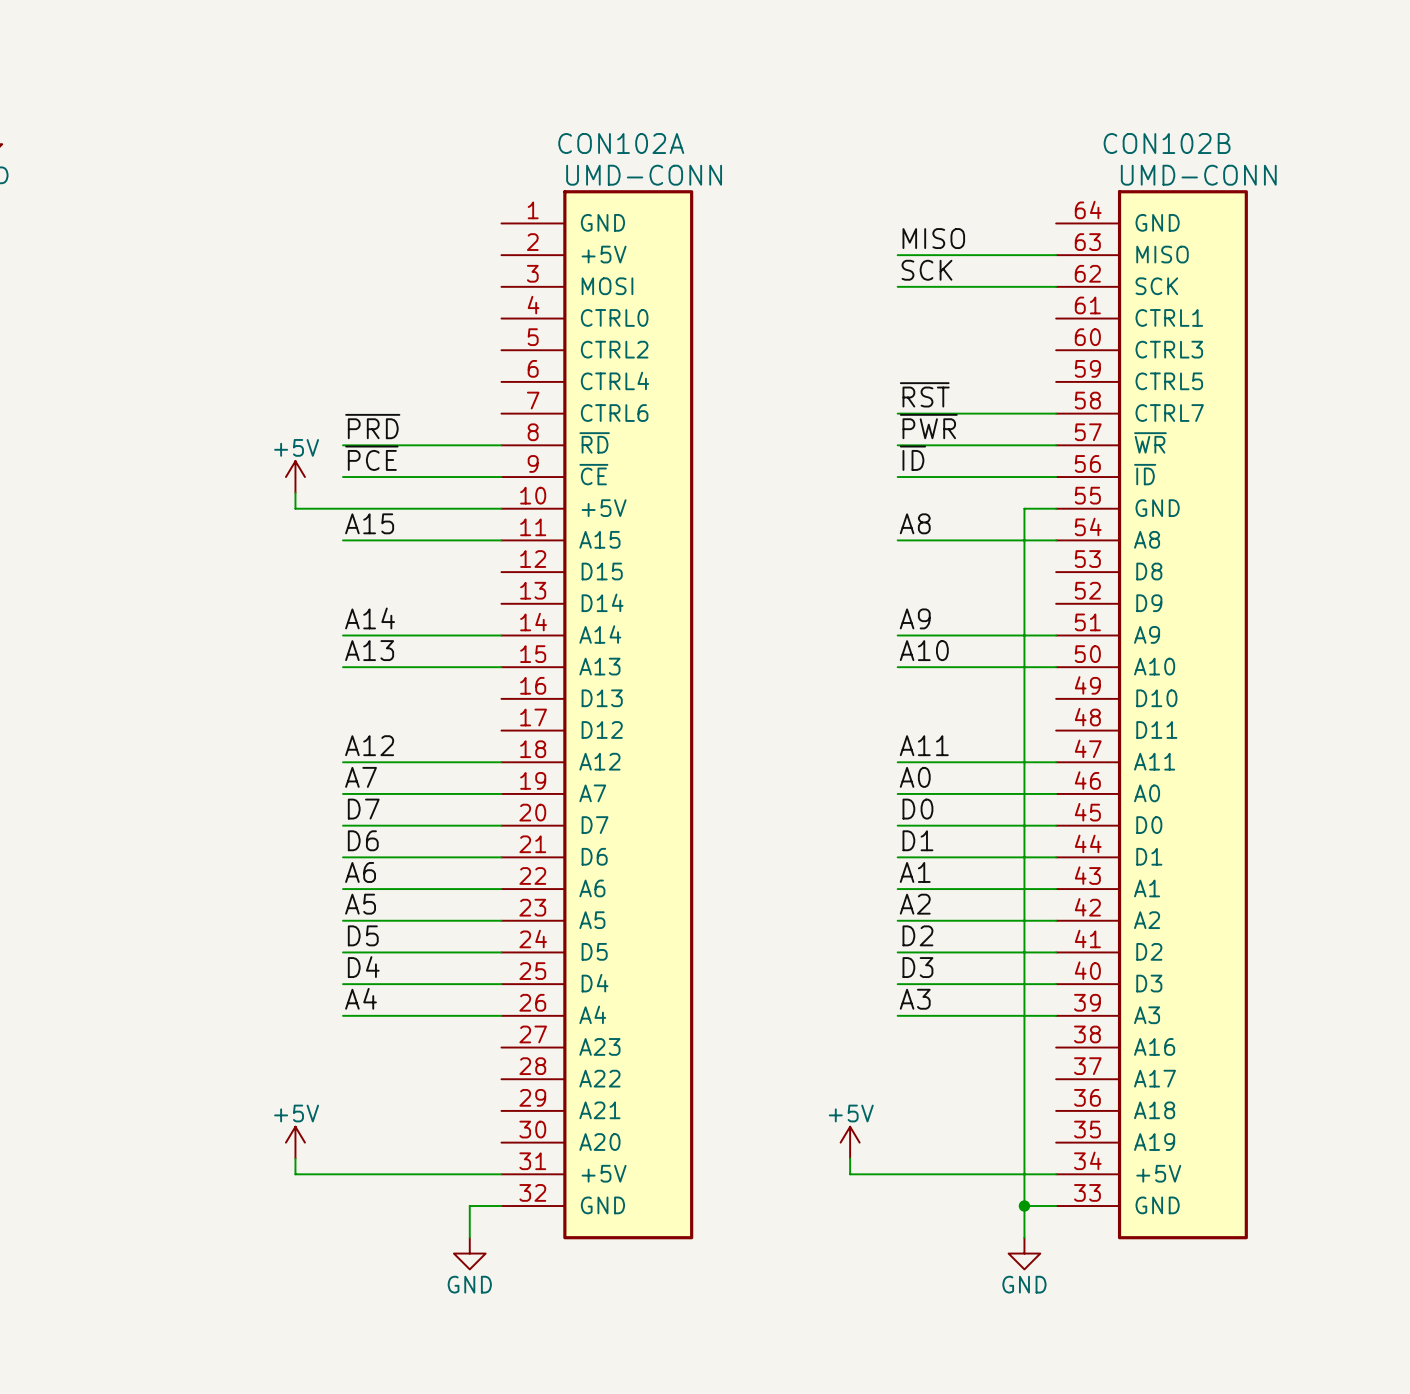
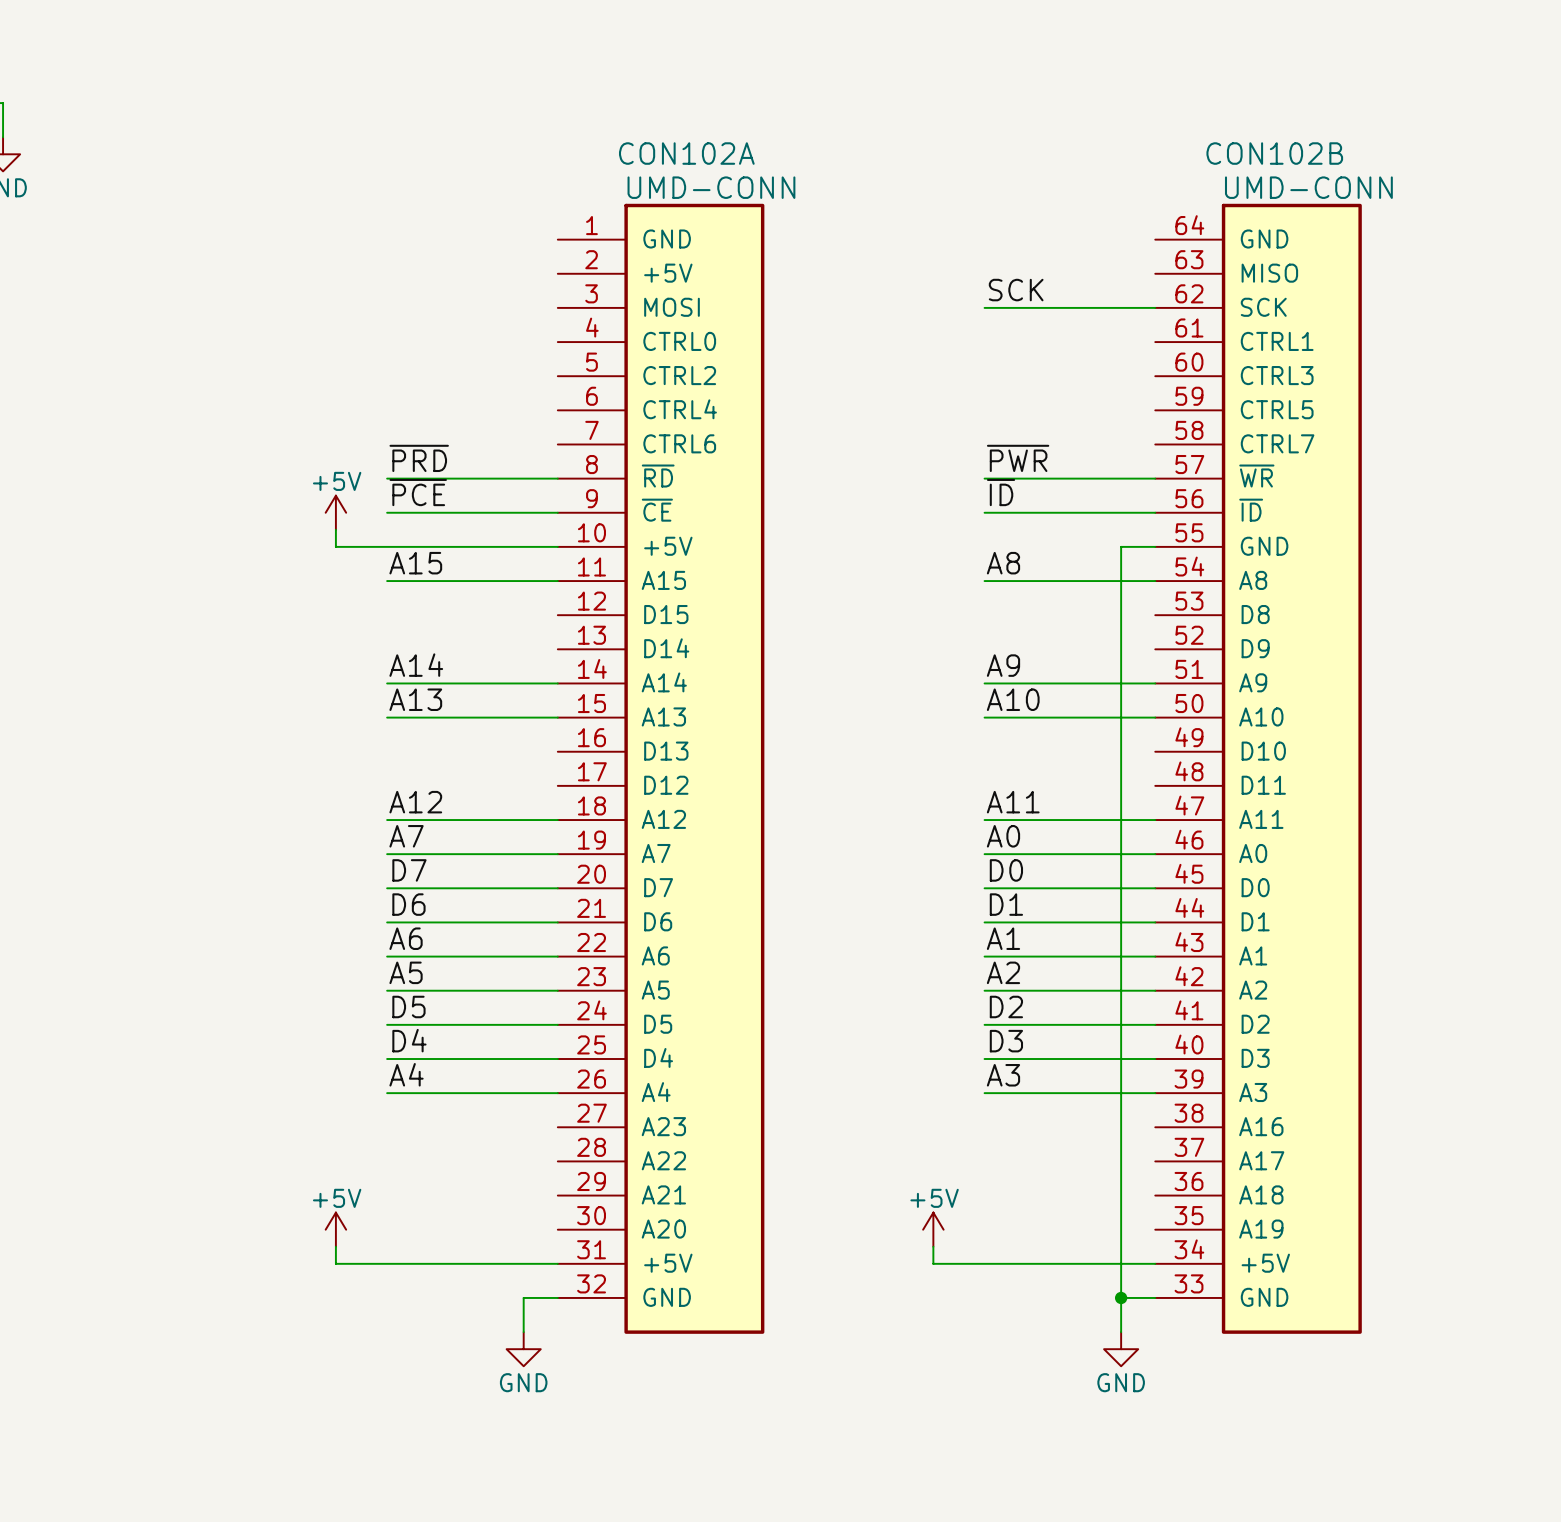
label: MISO (933, 238) -> none
wire: (897, 255) (1056, 255) -> none
label: ~{RST} (924, 394) -> none
wire: (897, 413) (1056, 413) -> none

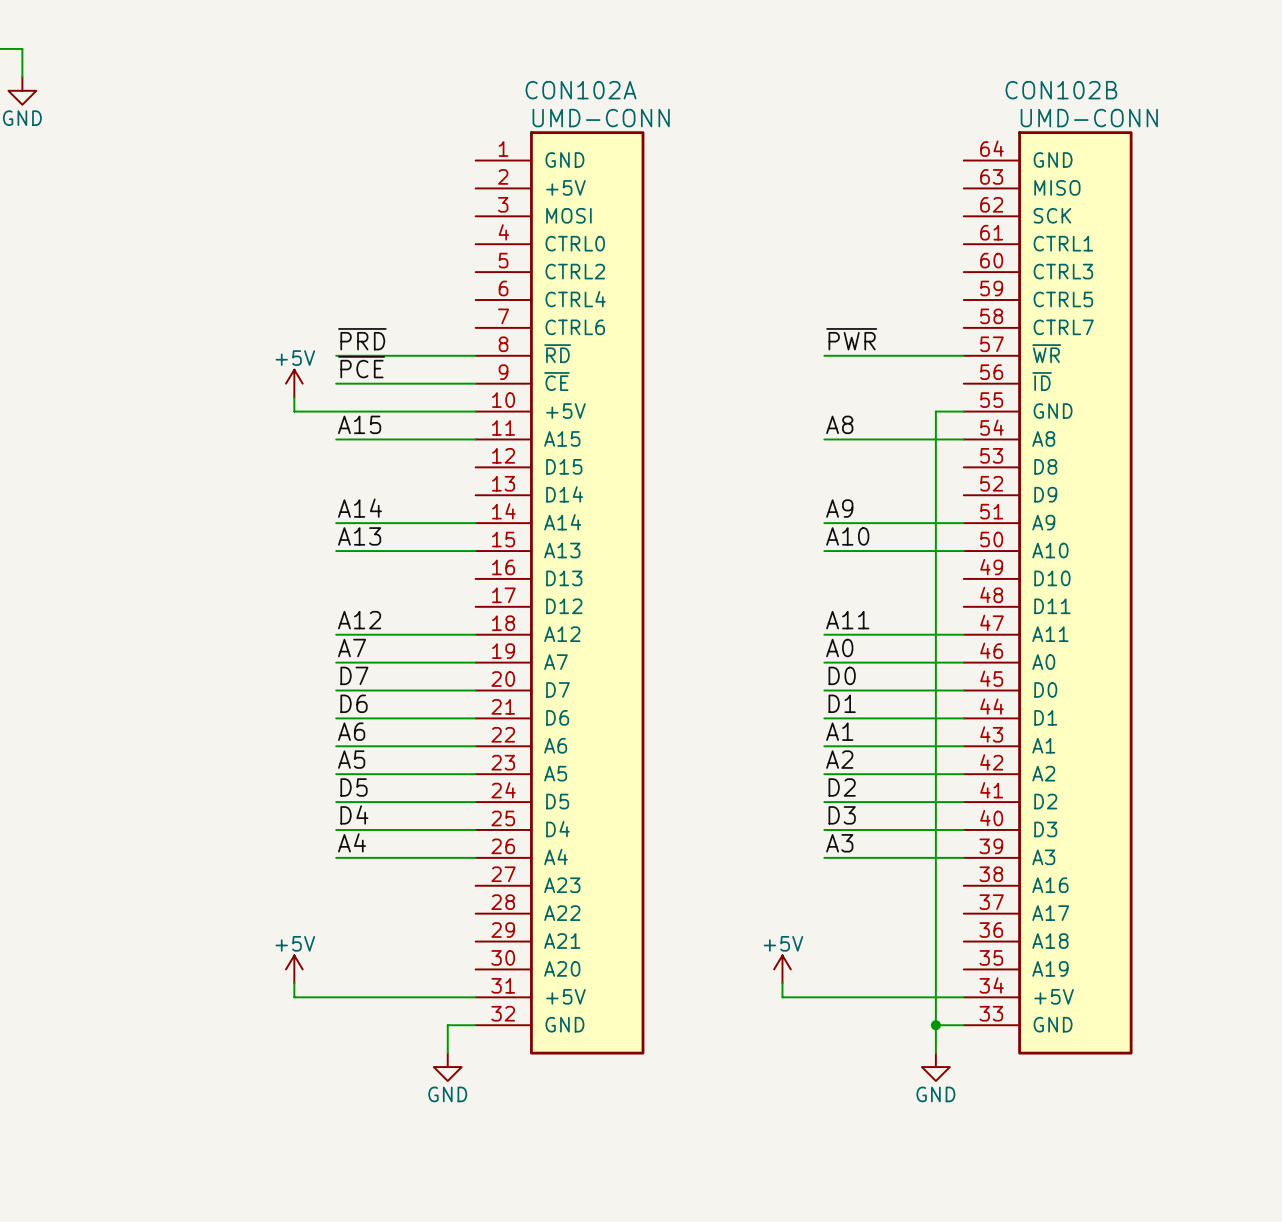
label: SCK (1016, 290) -> none
wire: (984, 307) (1155, 307) -> none
label: ~{ID} (1001, 492) -> none
wire: (984, 512) (1155, 512) -> none

